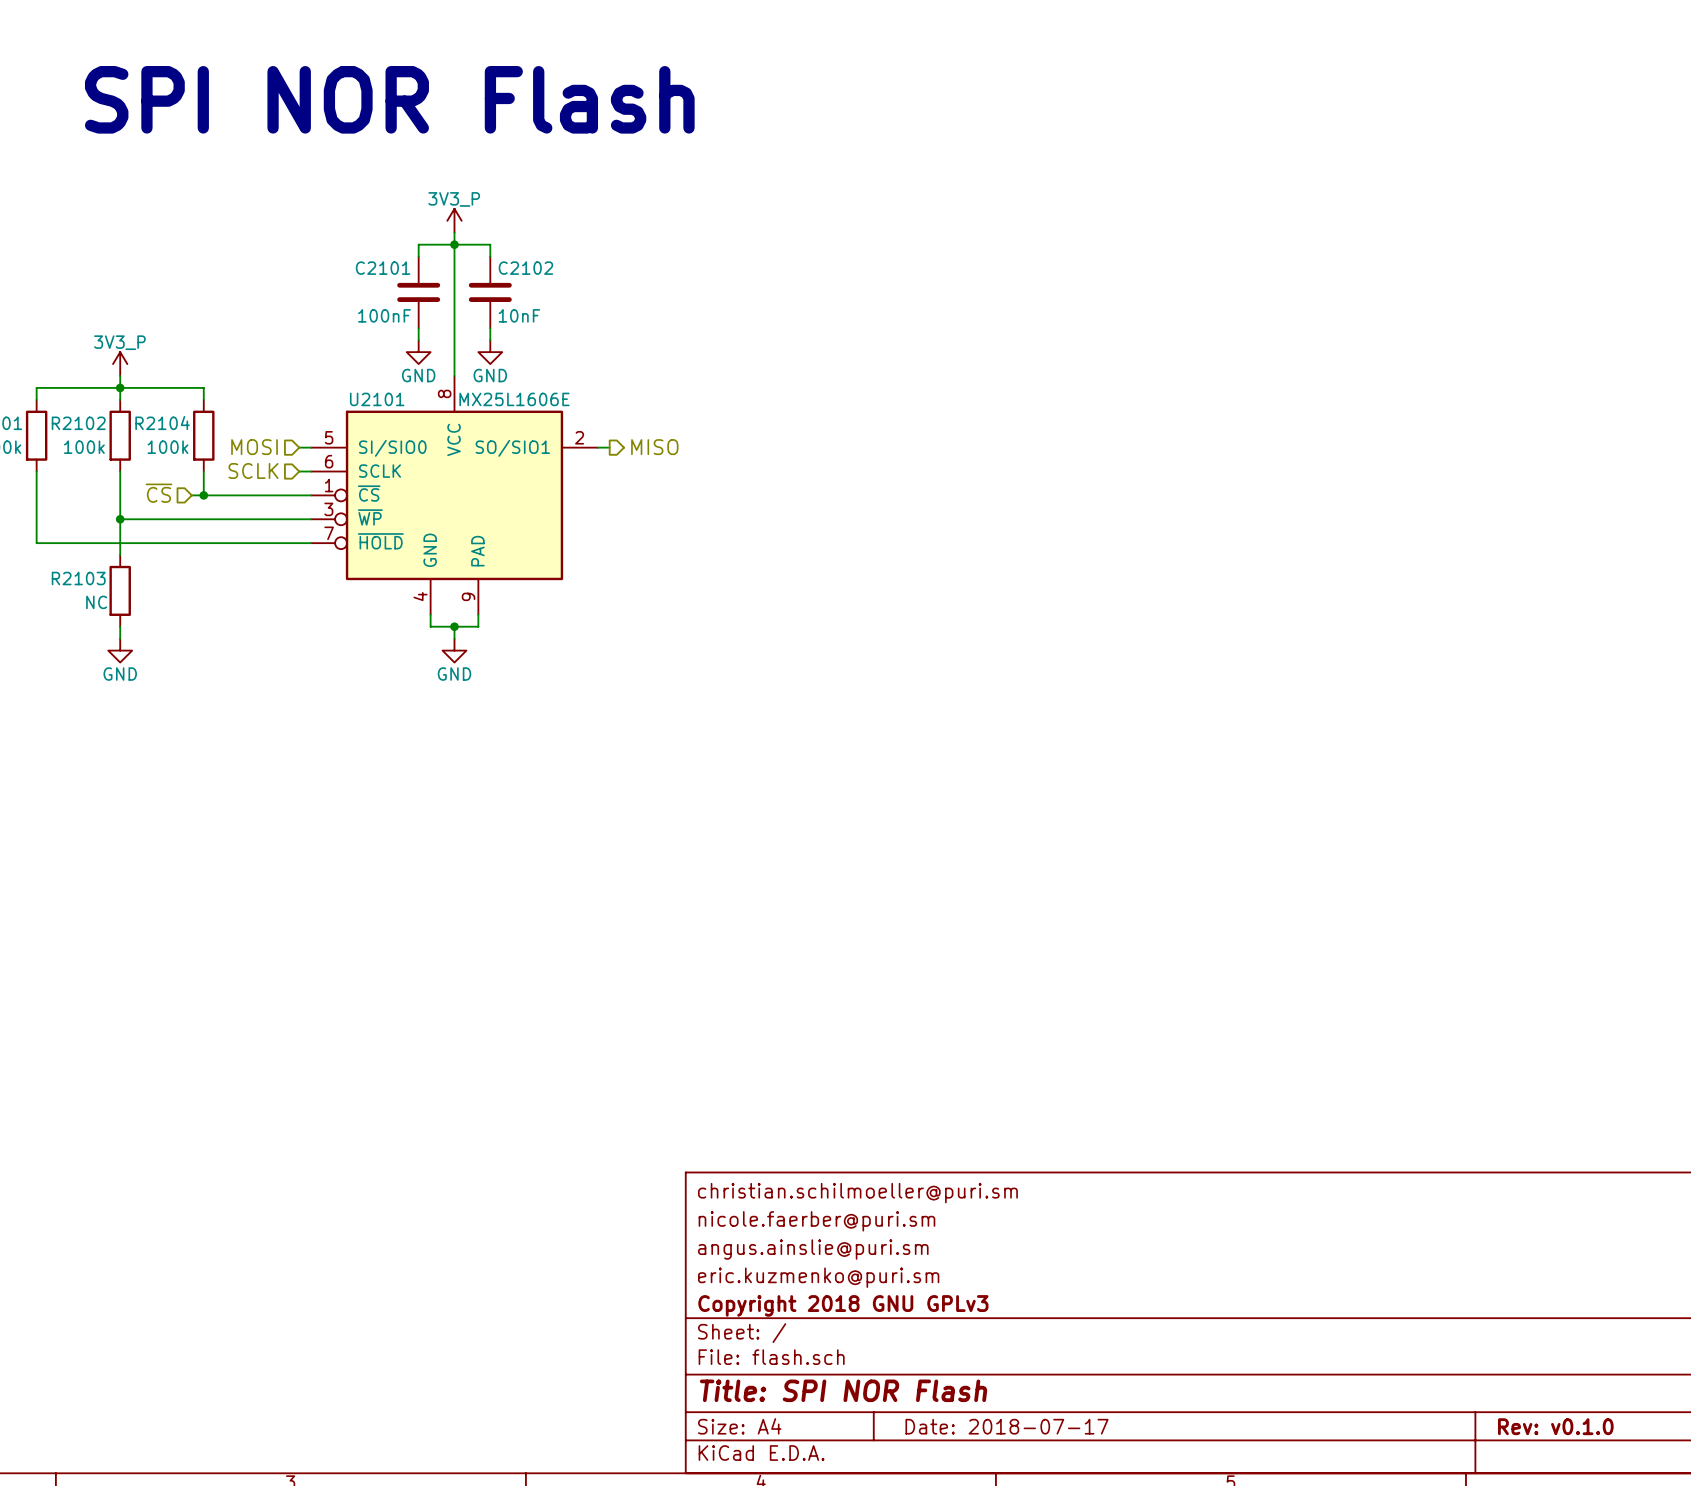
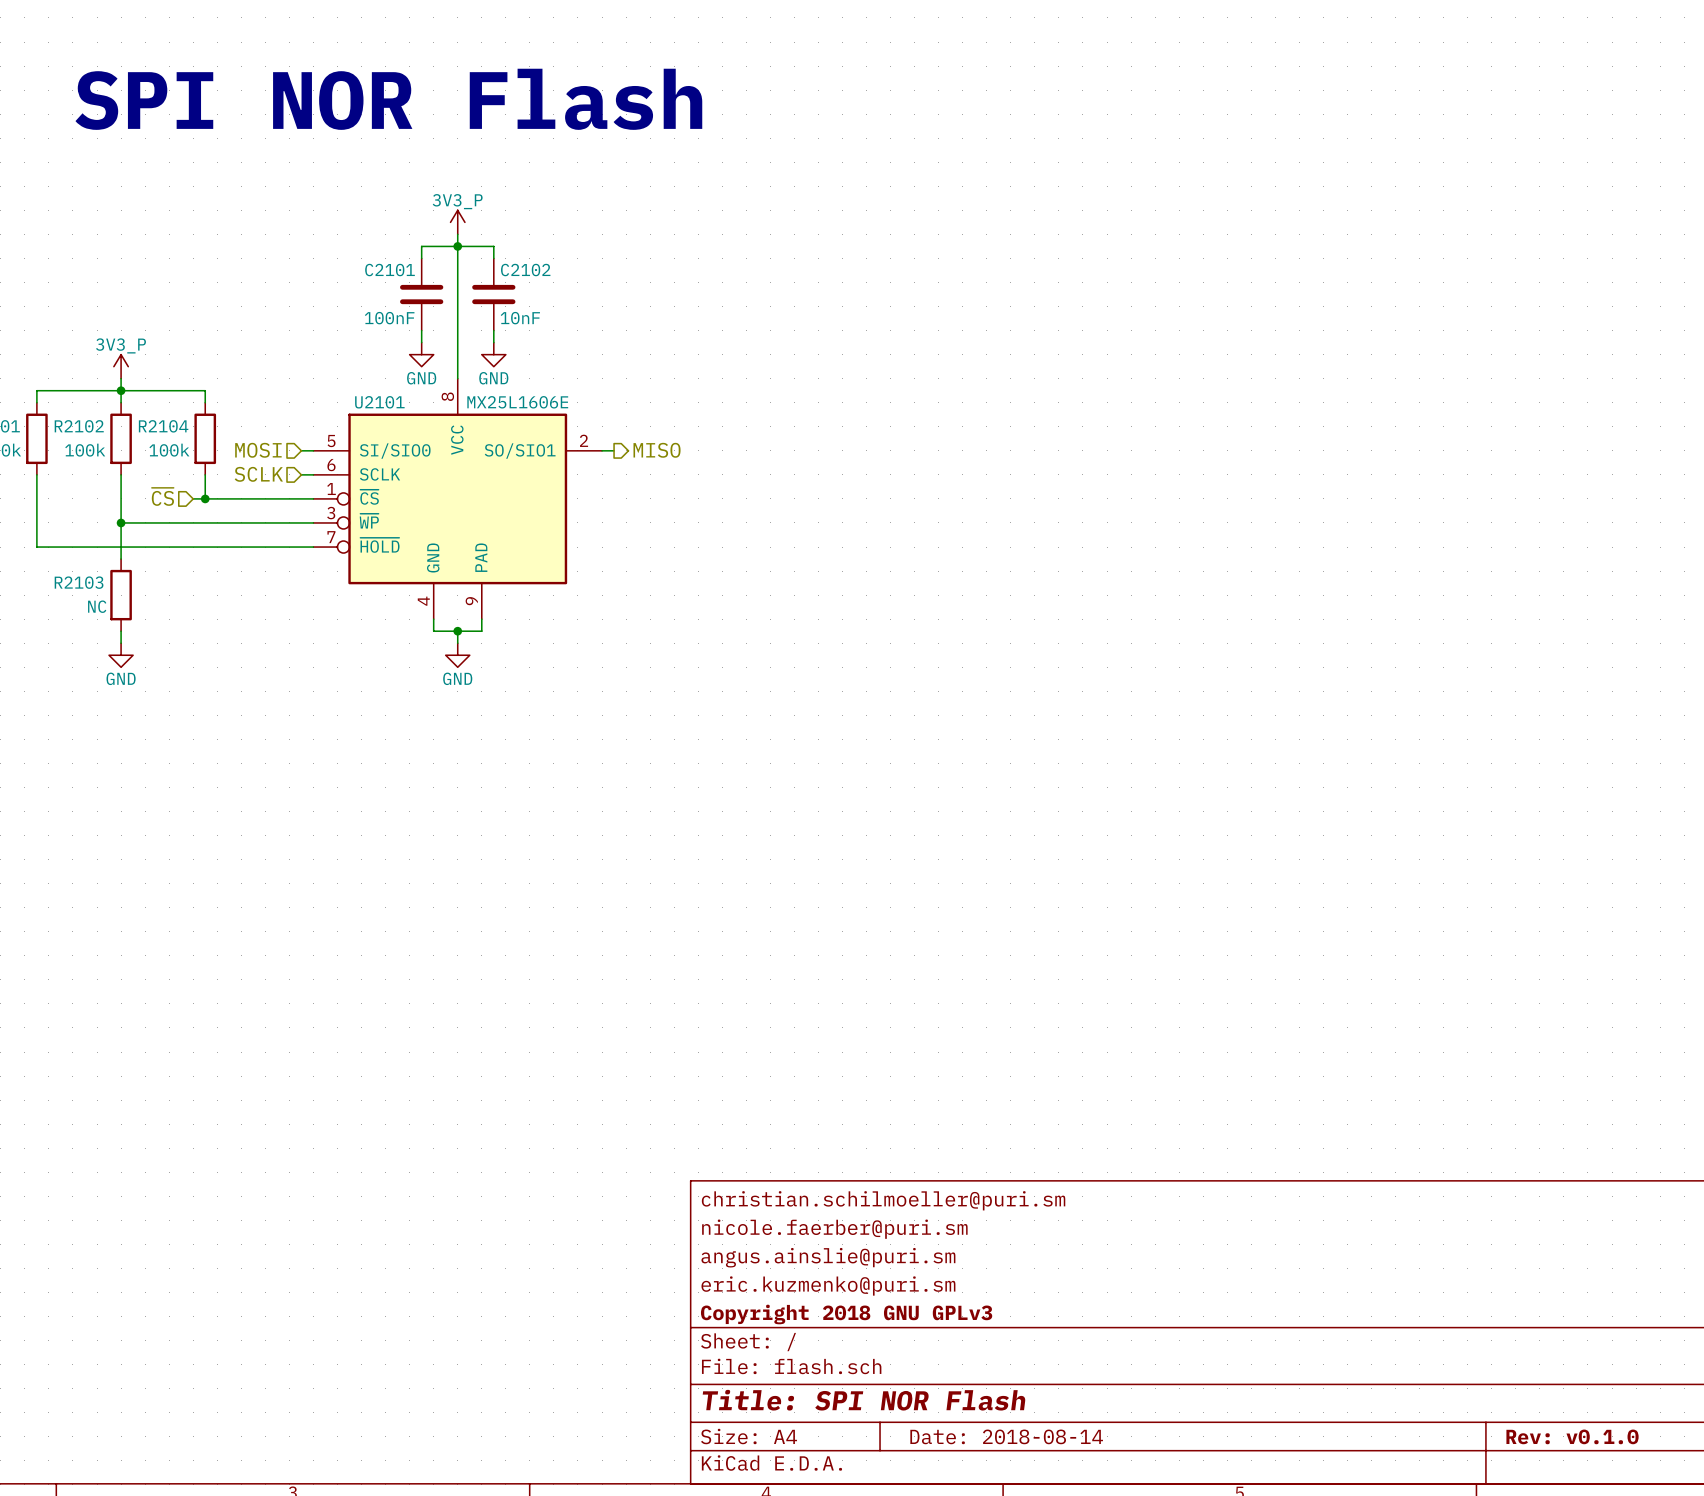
title block: Date: 2018-07-17 (1006, 1426) -> Date: 2018-08-14 (1006, 1436)

